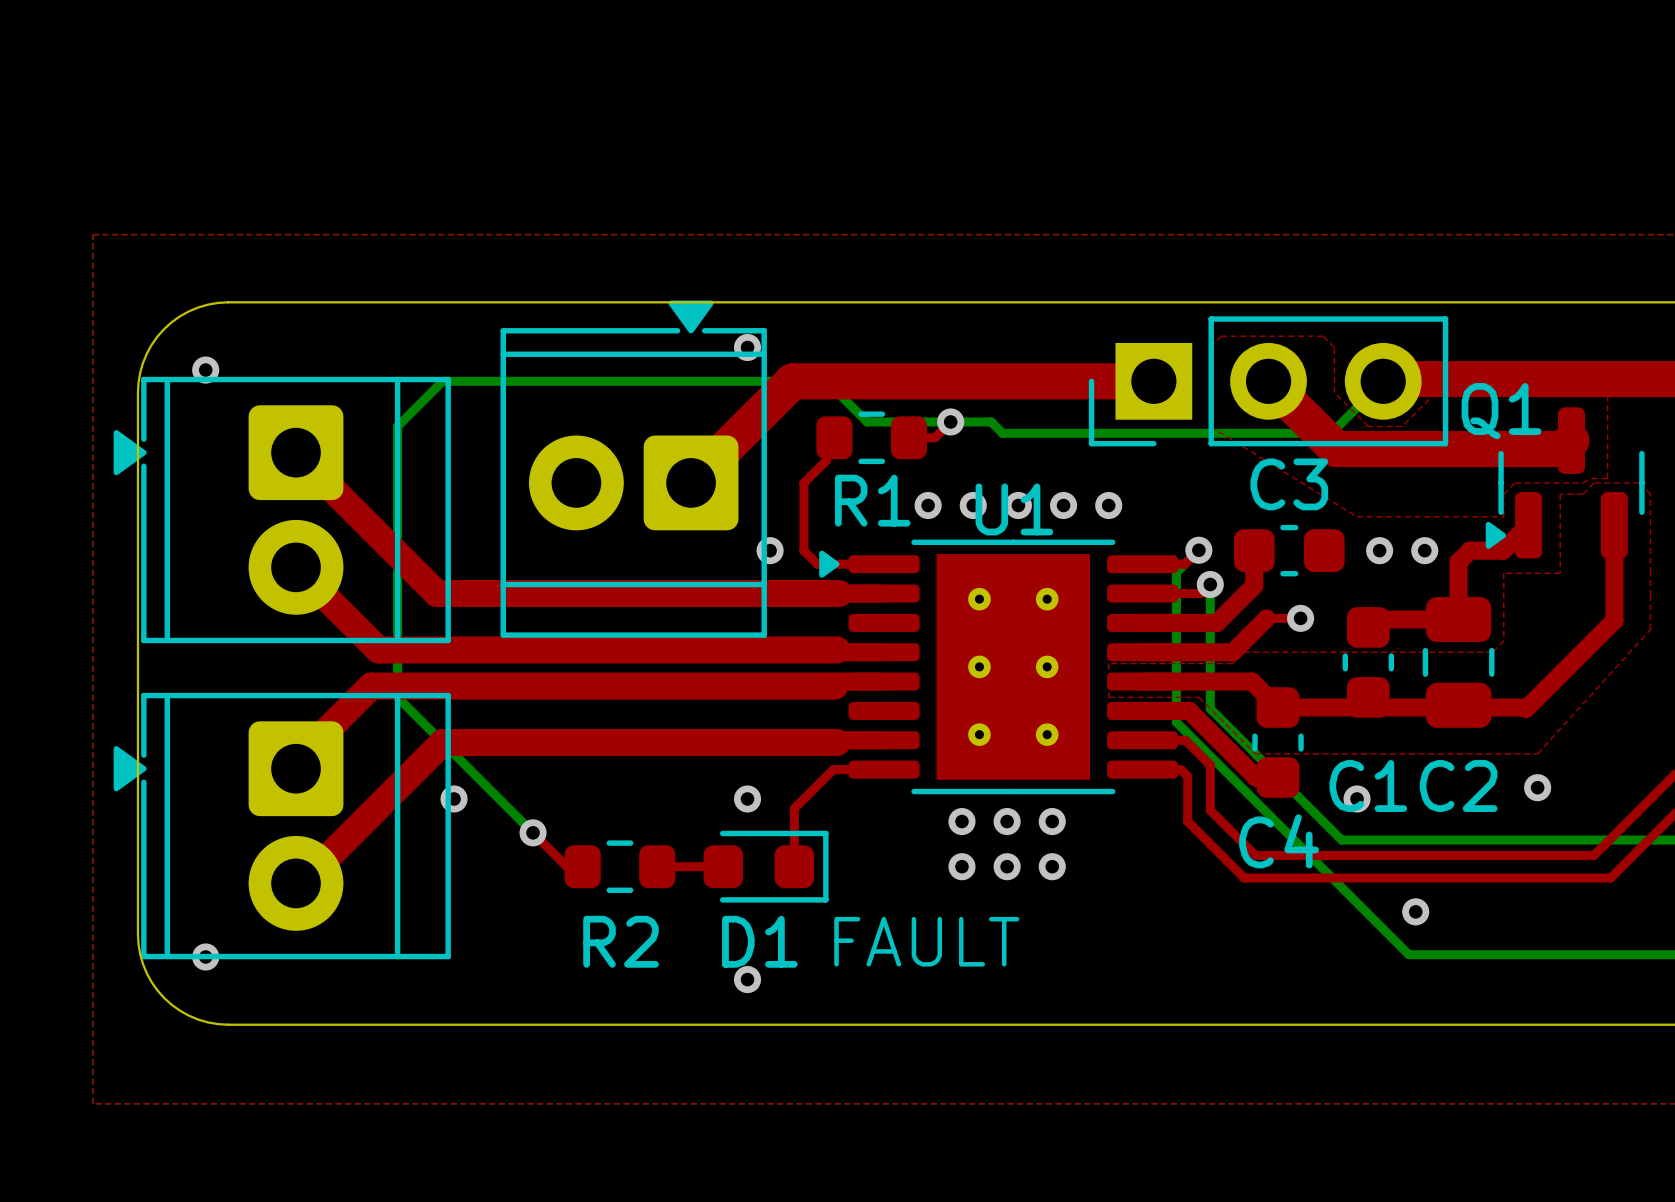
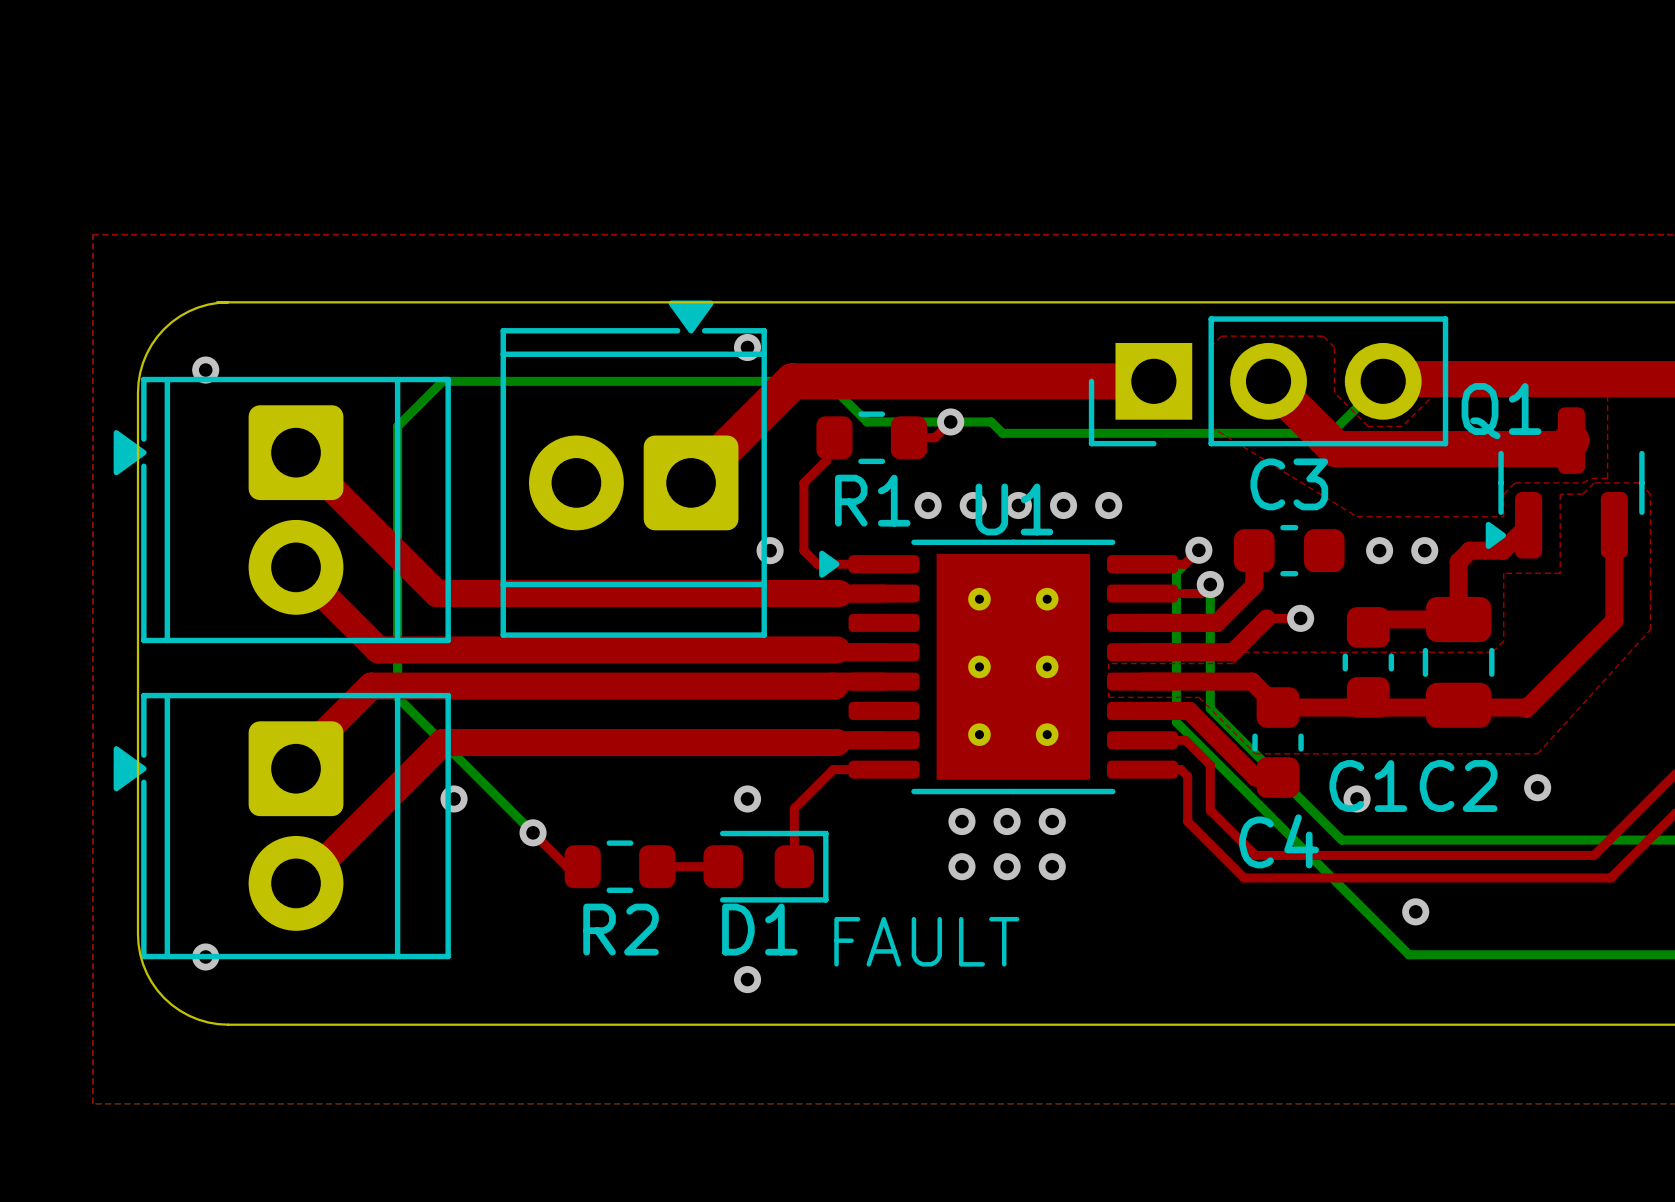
R2 name position: R2 (621, 941) -> R2 (621, 929)
D1 name position: D1 (759, 941) -> D1 (759, 929)

